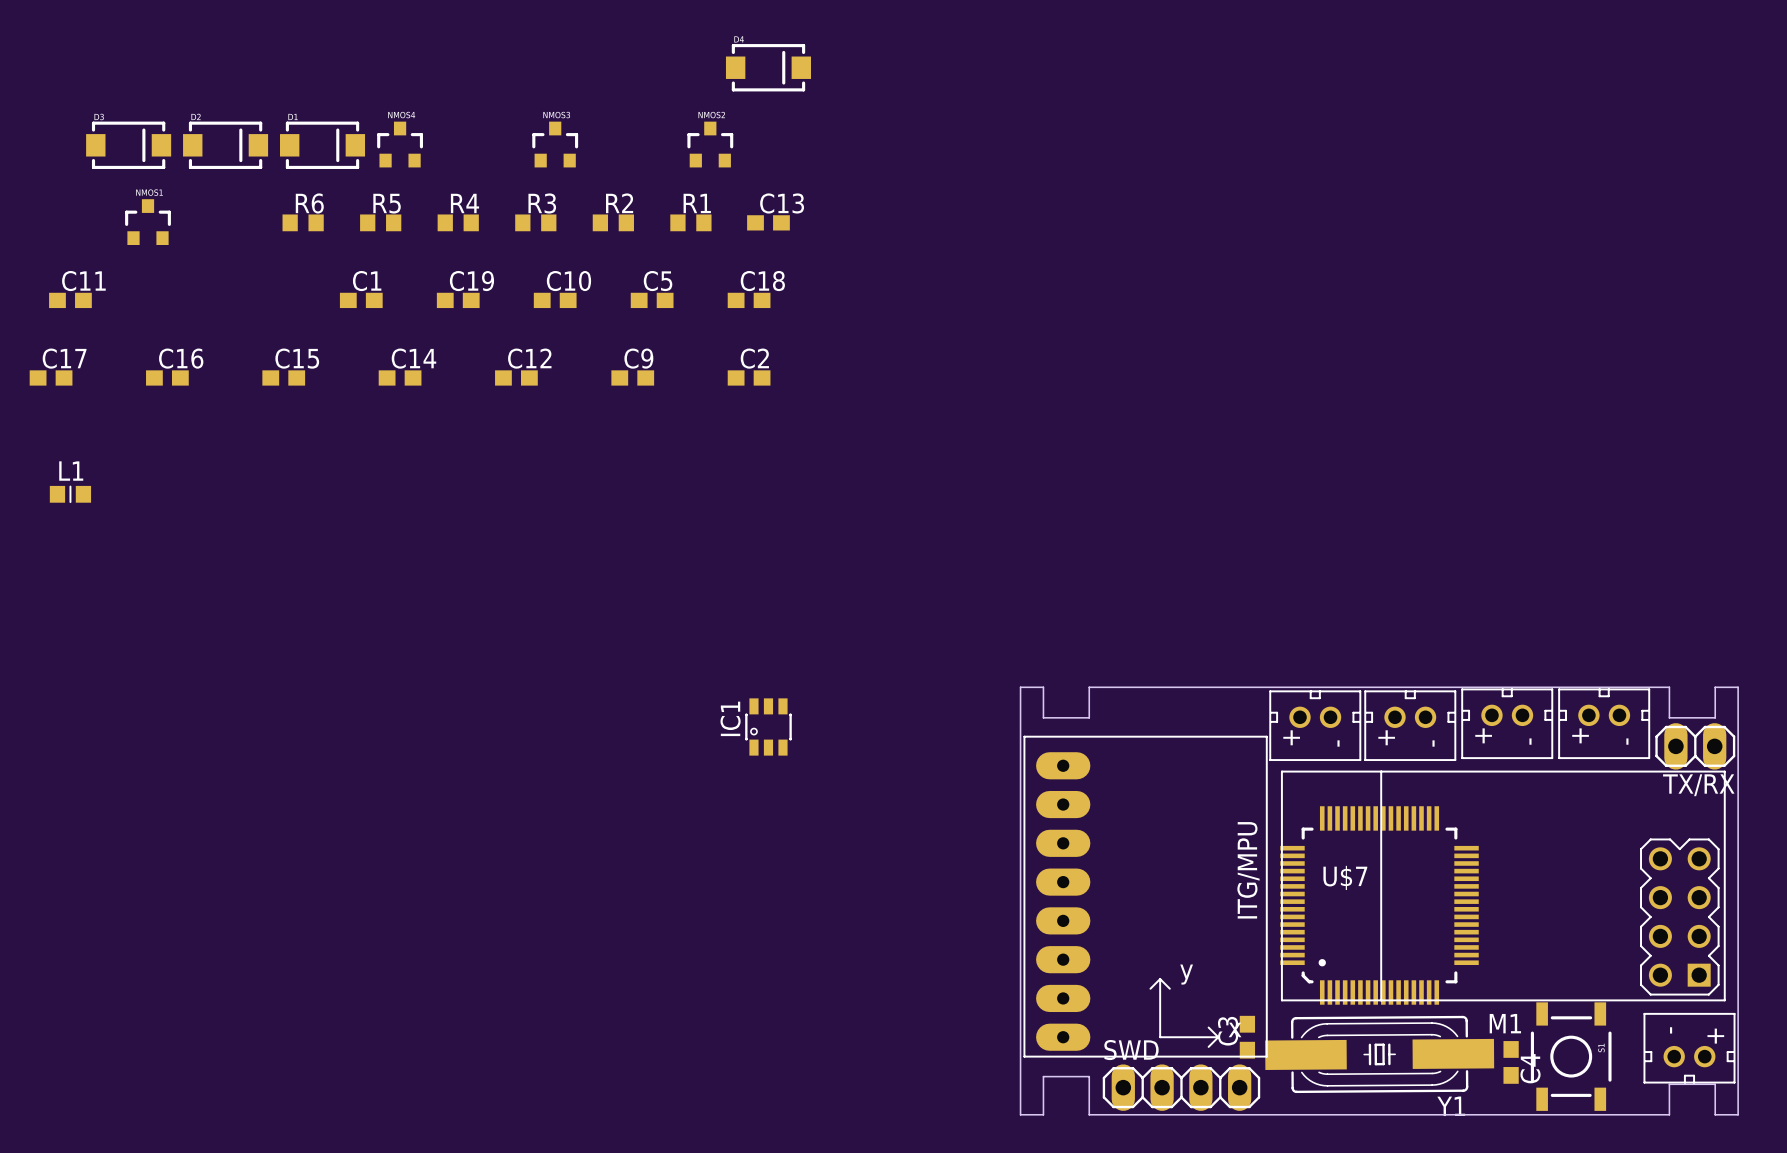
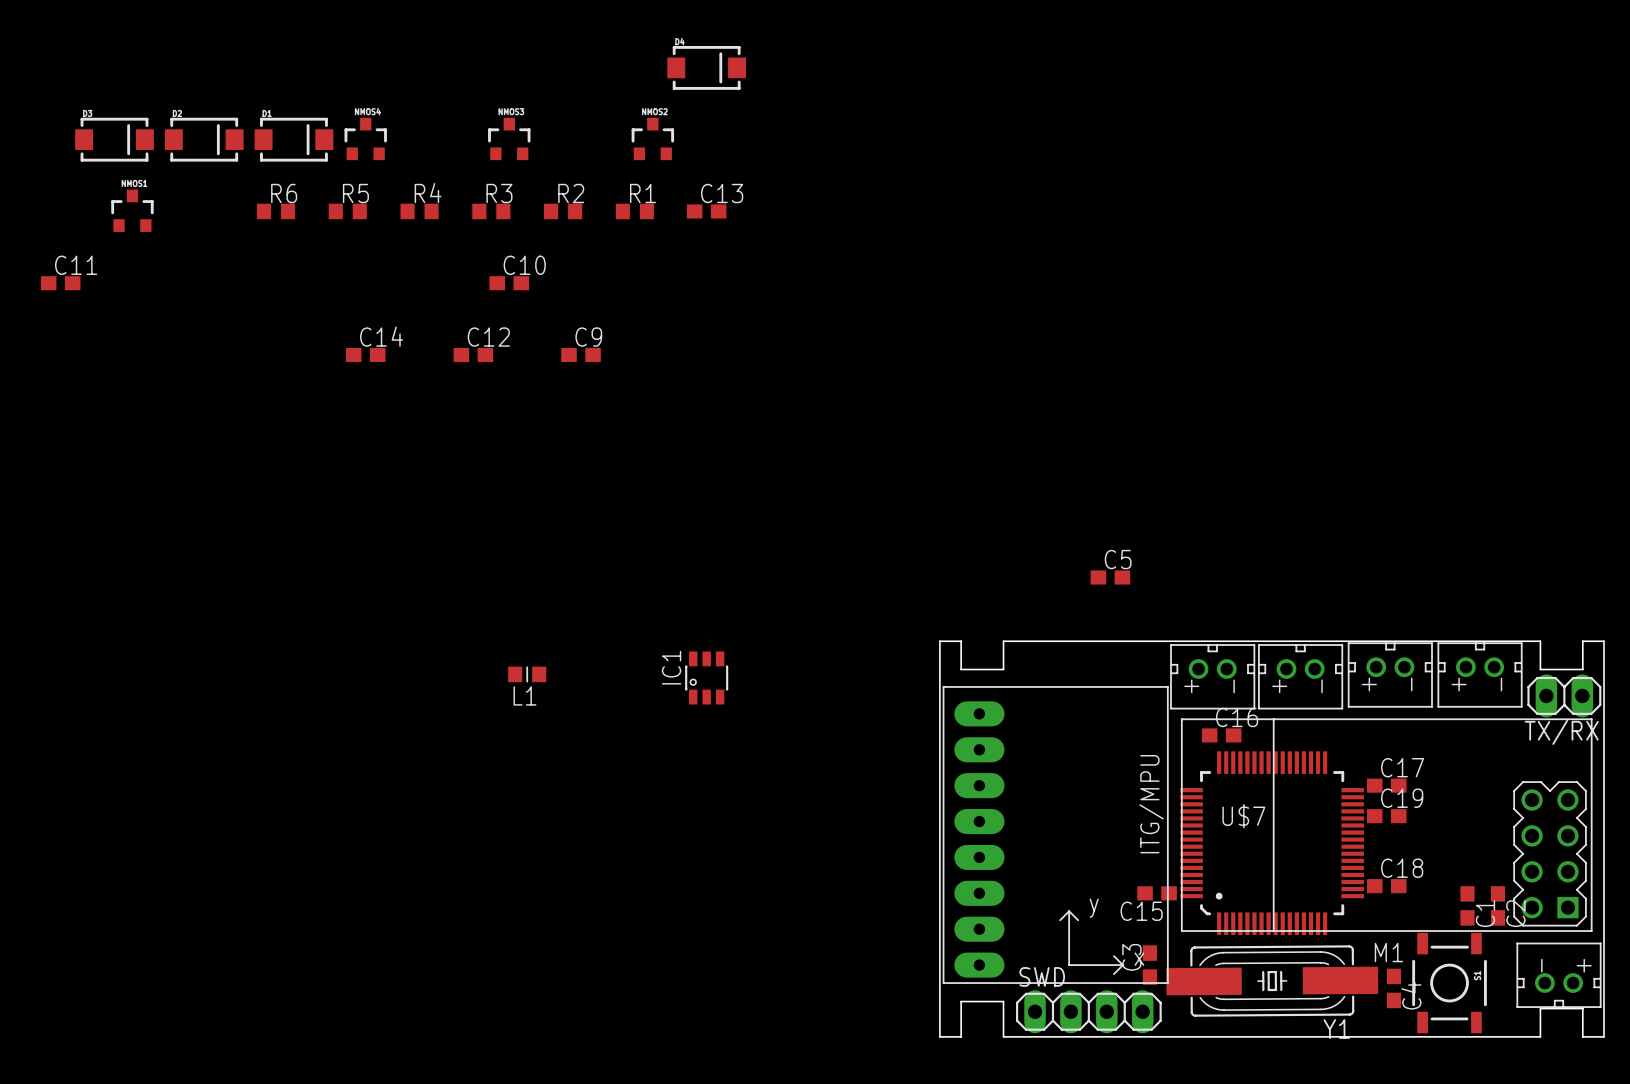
C1 rotation: 0° (361, 300) -> 90° clockwise (1467, 905)
C1 position: (361, 300) -> (1467, 905)
C19 position: (458, 300) -> (1386, 816)
C5 position: (652, 300) -> (1110, 577)
C18 position: (749, 300) -> (1386, 886)
C15 name position: C15 (297, 358) -> C15 (1141, 911)
C17 position: (51, 377) -> (1386, 785)
C16 position: (167, 377) -> (1221, 735)
C15 position: (283, 377) -> (1157, 893)
C2 rotation: 0° (749, 377) -> 90° clockwise (1497, 905)
C2 position: (749, 377) -> (1497, 905)
L1 name position: L1 (71, 471) -> L1 (524, 695)
L1 position: (70, 494) -> (527, 674)

